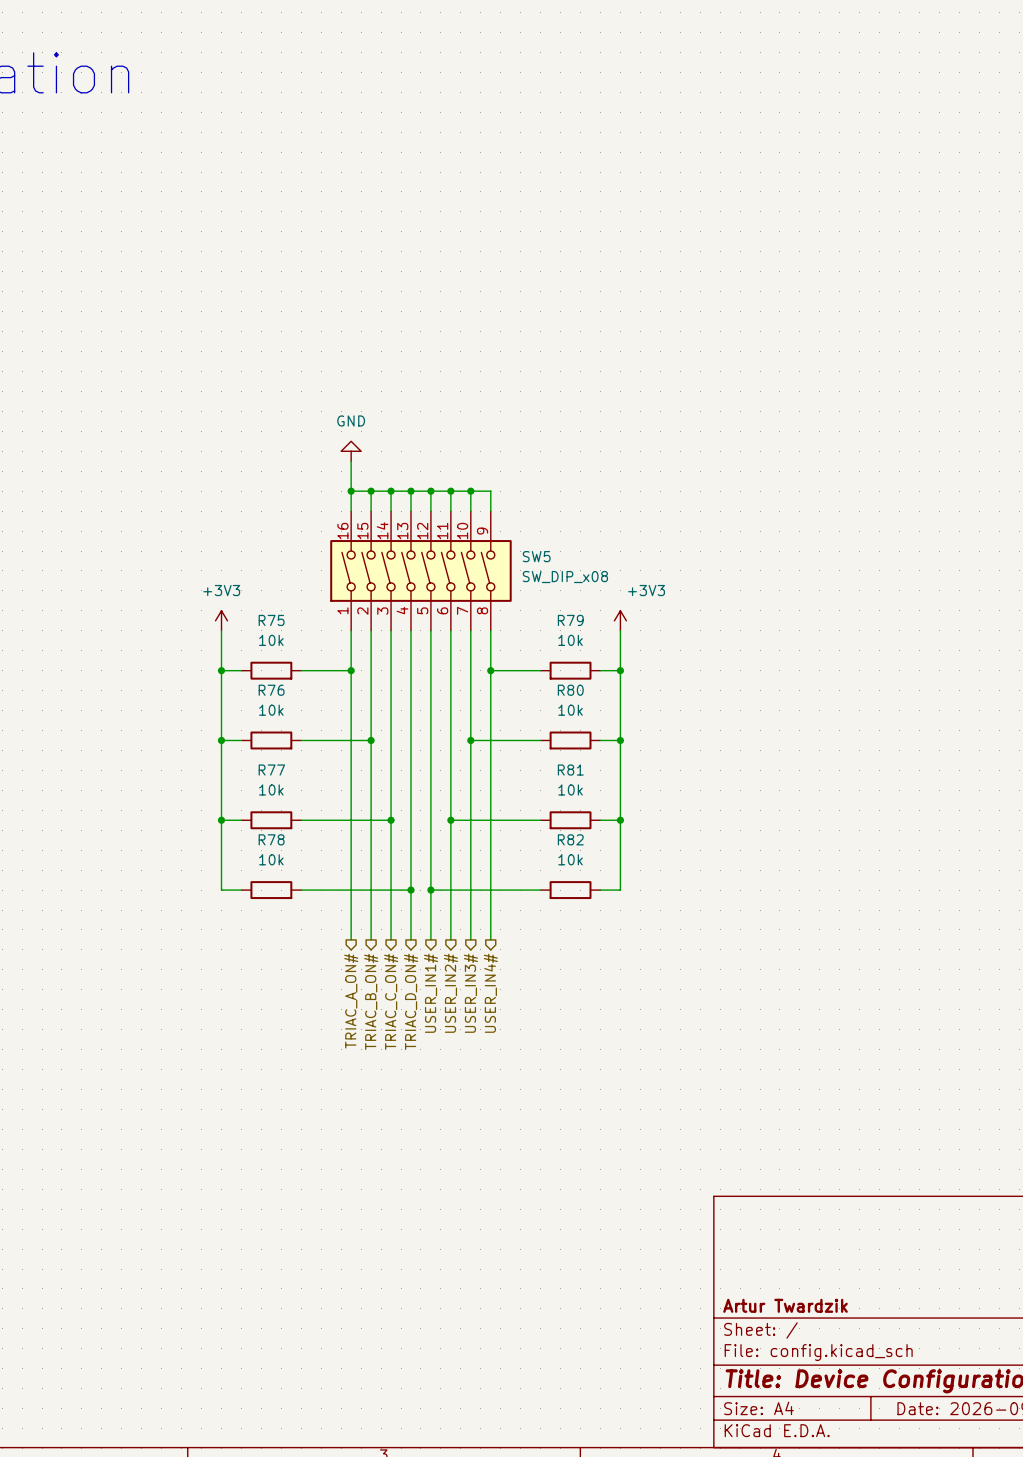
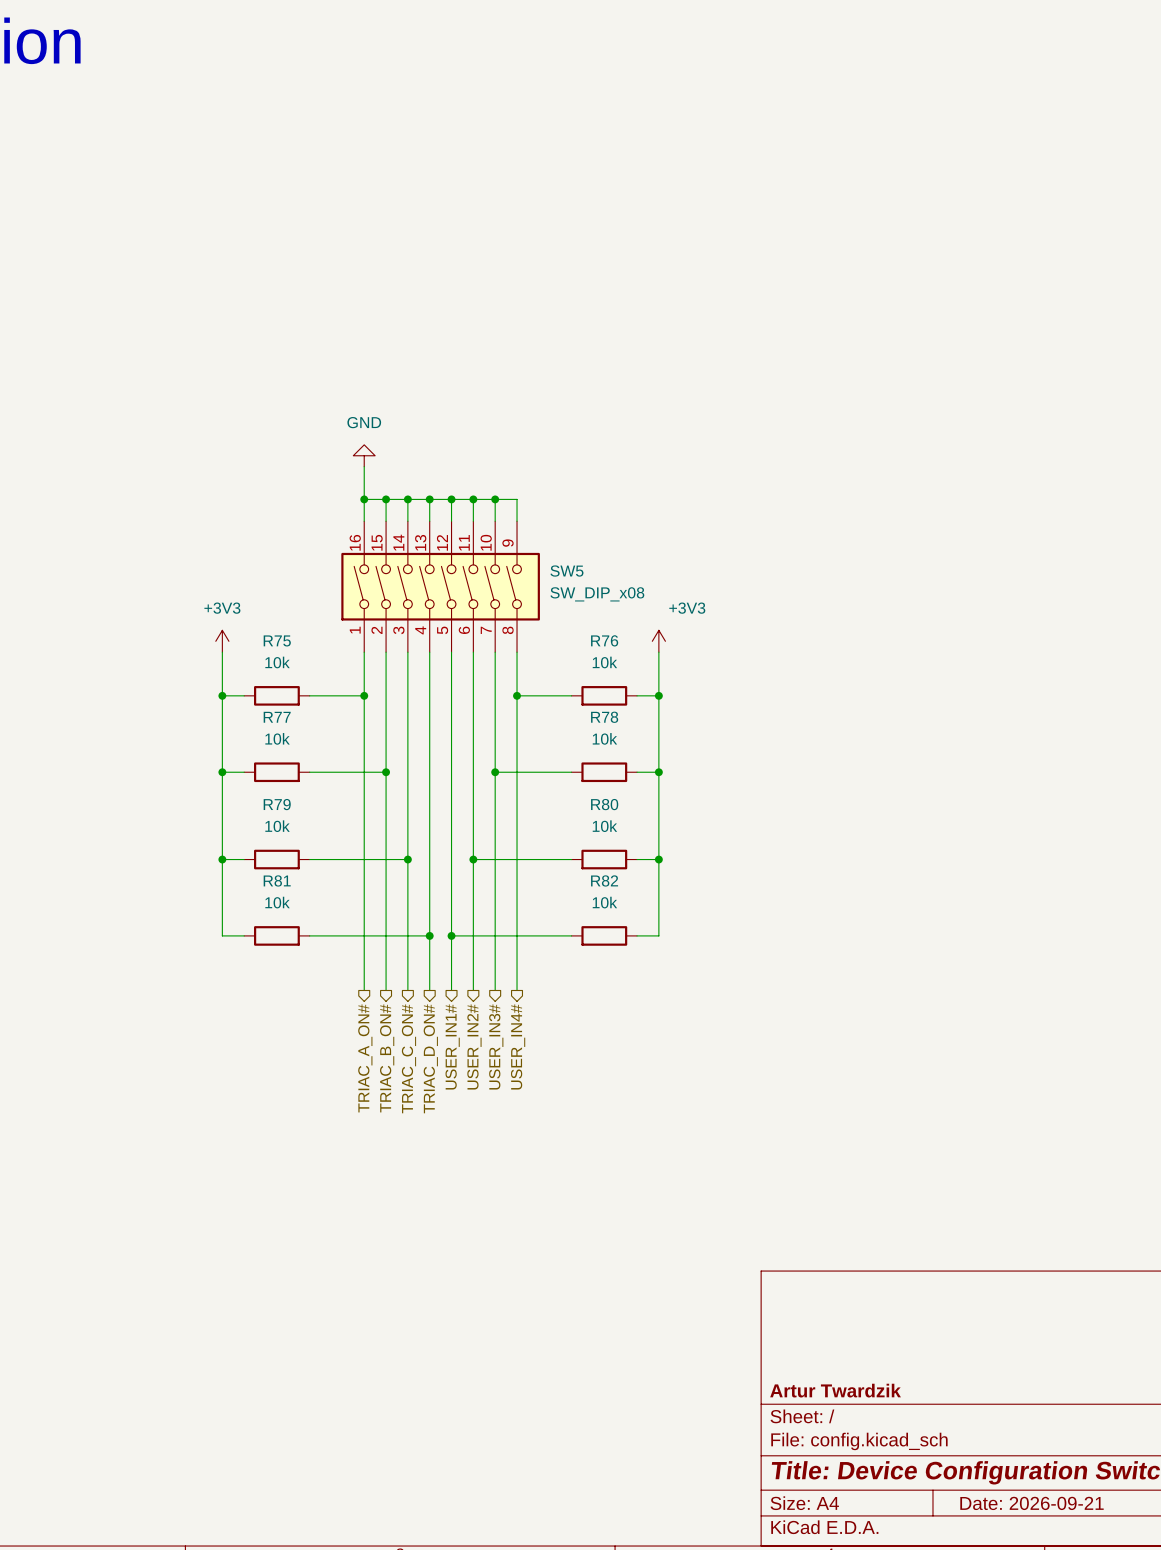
R79 name: R79 (570, 620) -> R76 (604, 640)
R76 name: R76 (271, 690) -> R77 (277, 717)
R80 name: R80 (570, 690) -> R78 (604, 717)
R77 name: R77 (271, 770) -> R79 (277, 804)
R81 name: R81 (570, 770) -> R80 (604, 804)
R78 name: R78 (271, 839) -> R81 (277, 880)

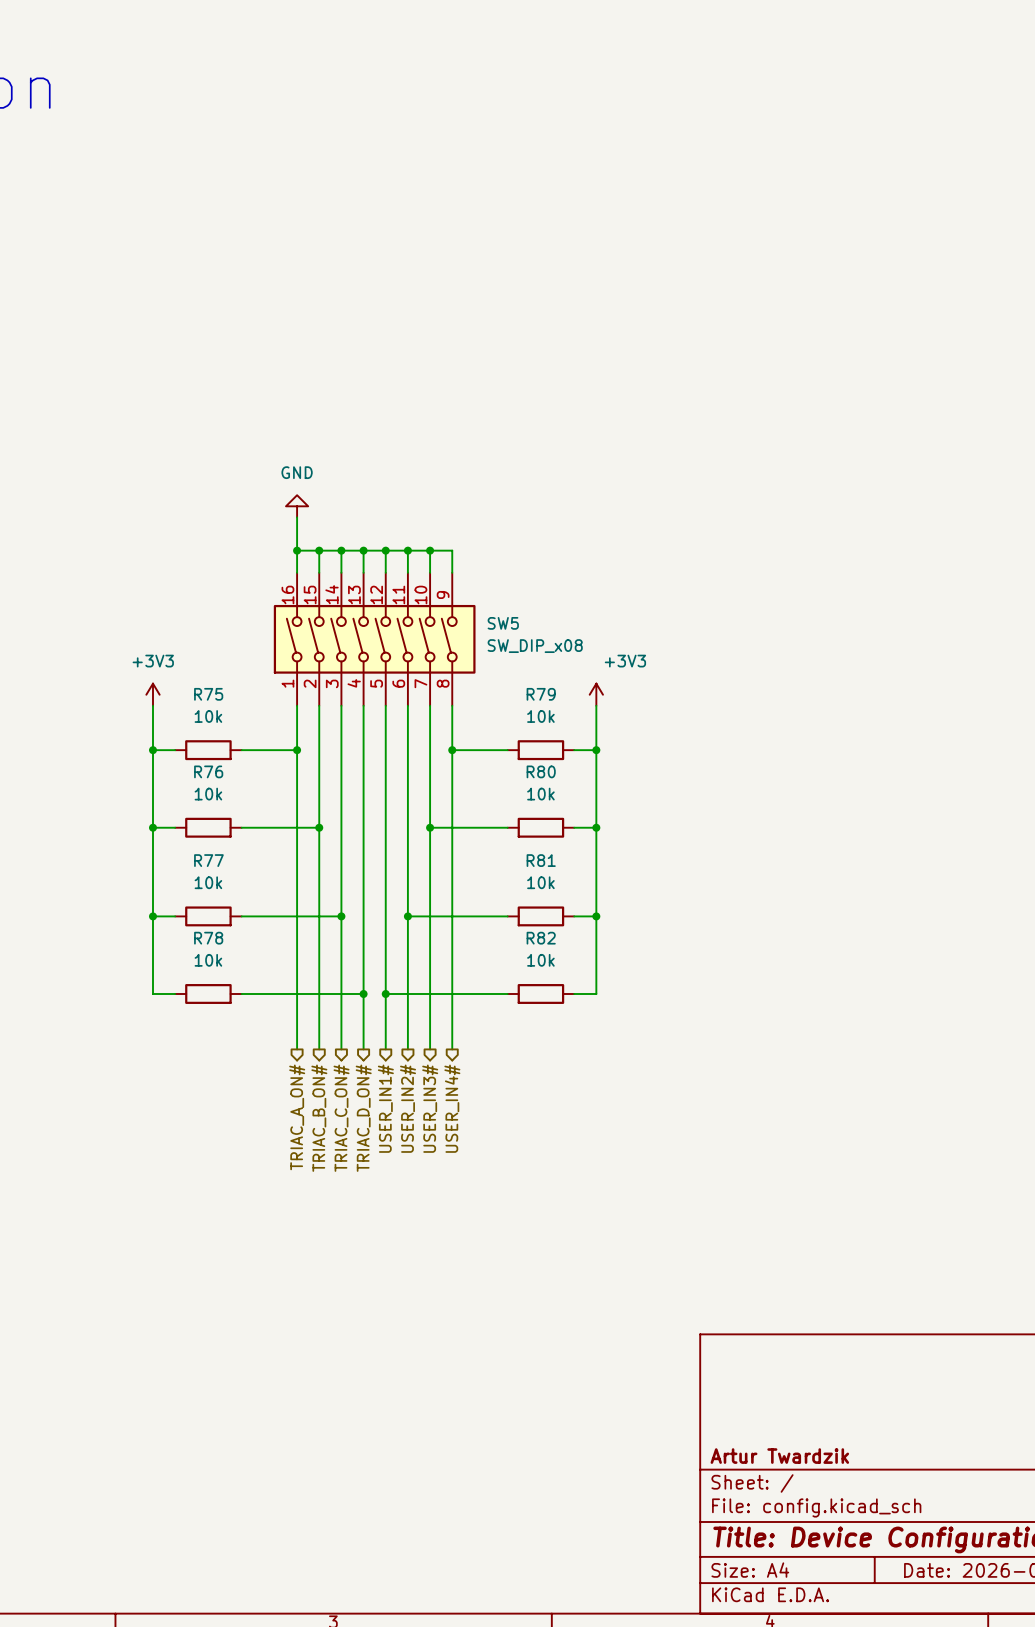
R76 name: R76 (604, 640) -> R79 (541, 694)
R77 name: R77 (277, 717) -> R76 (208, 771)
R78 name: R78 (604, 717) -> R80 (541, 771)
R79 name: R79 (277, 804) -> R77 (208, 860)
R80 name: R80 (604, 804) -> R81 (541, 860)
R81 name: R81 (277, 880) -> R78 (208, 938)

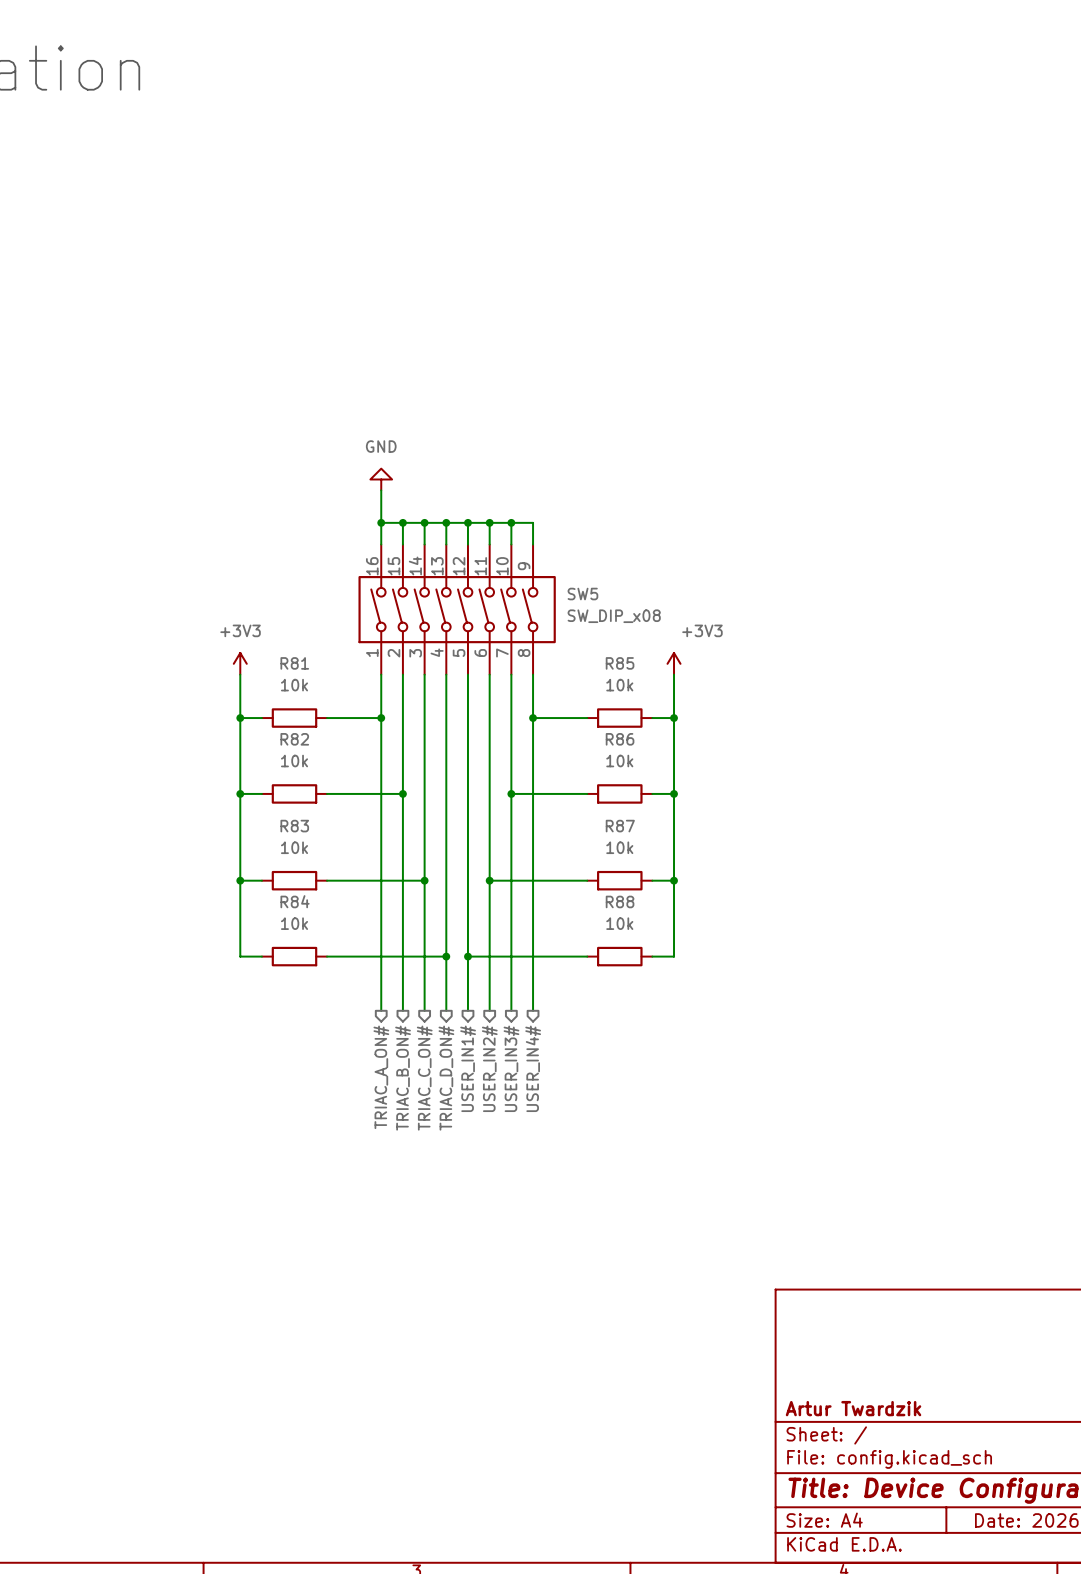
R75 name: R75 (208, 694) -> R81 (294, 663)
R79 name: R79 (541, 694) -> R85 (620, 663)
R76 name: R76 (208, 771) -> R82 (294, 739)
R80 name: R80 (541, 771) -> R86 (620, 739)
R77 name: R77 (208, 860) -> R83 (294, 826)
R81 name: R81 (541, 860) -> R87 (620, 826)
R78 name: R78 (208, 938) -> R84 (295, 901)
R82 name: R82 (541, 938) -> R88 (620, 901)

